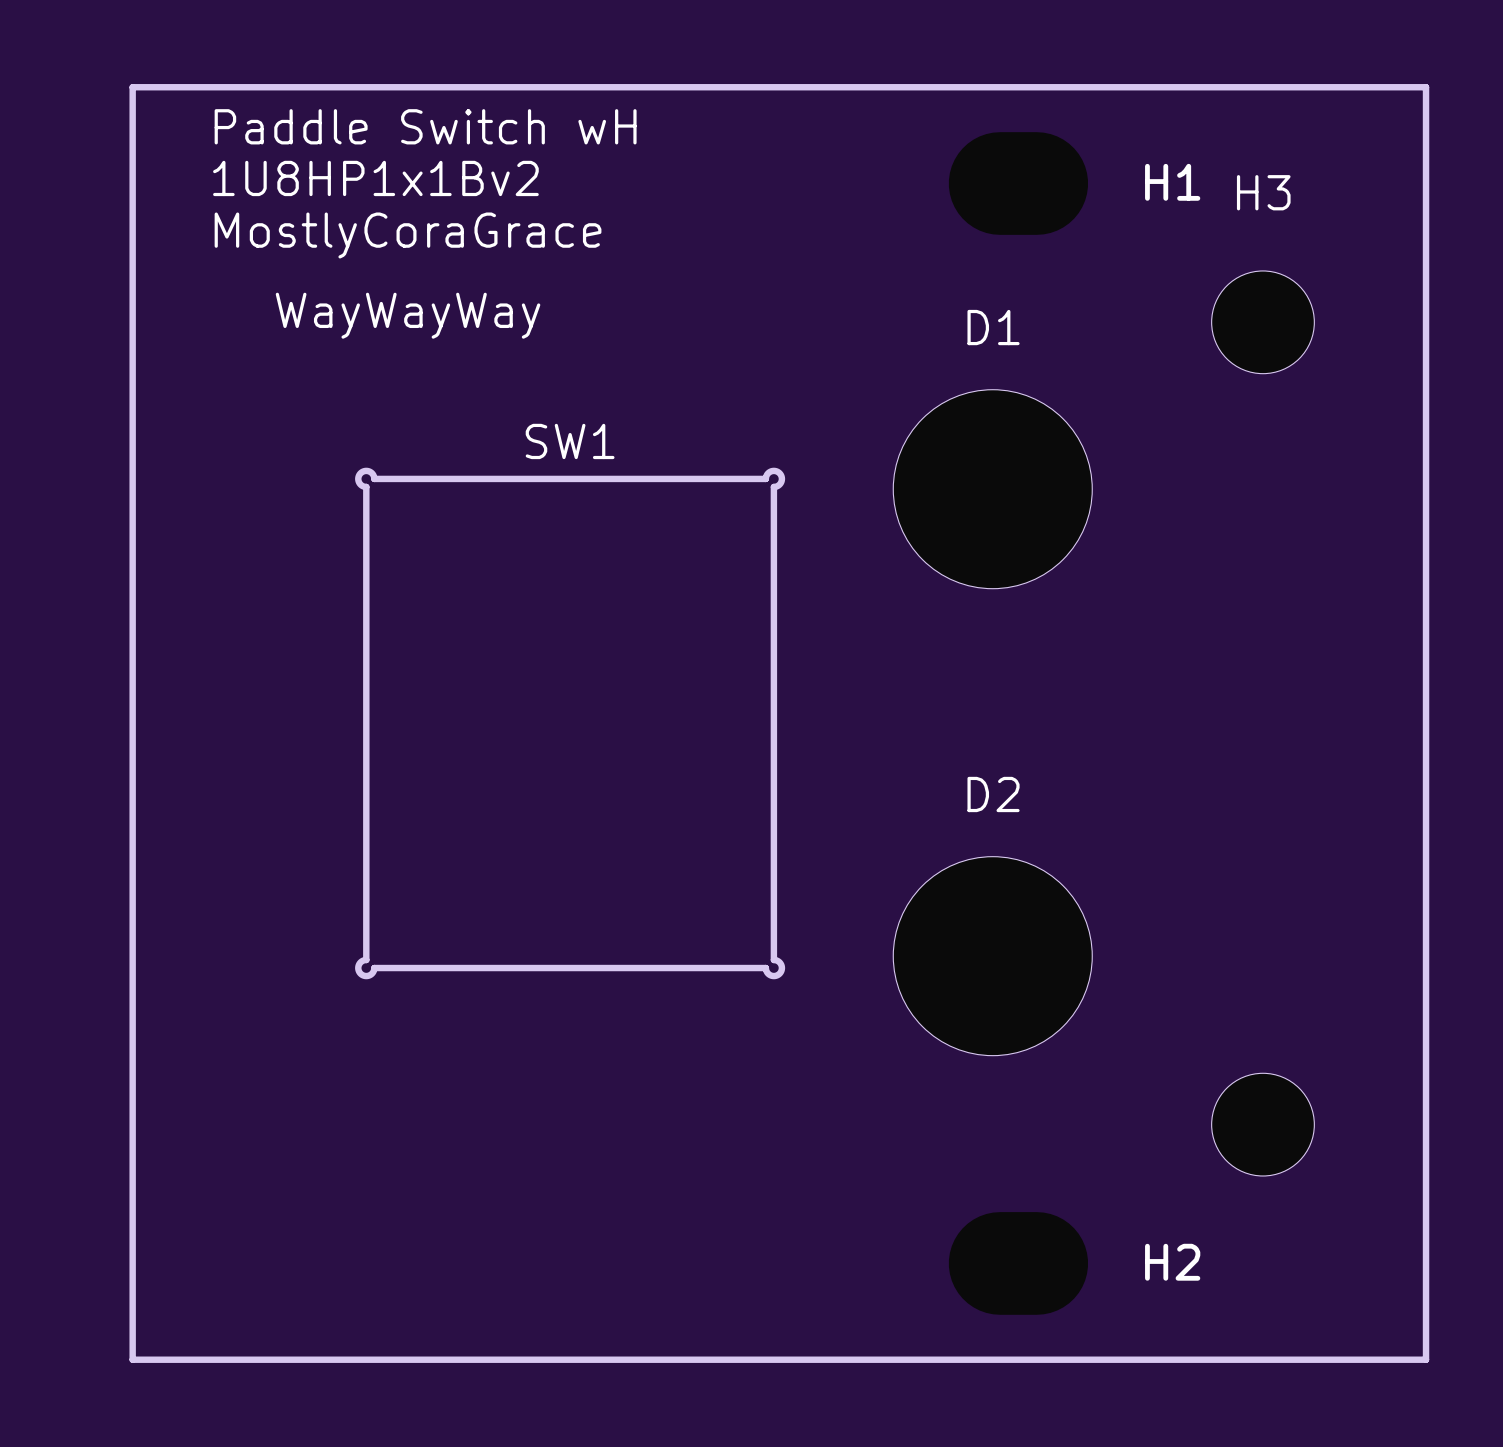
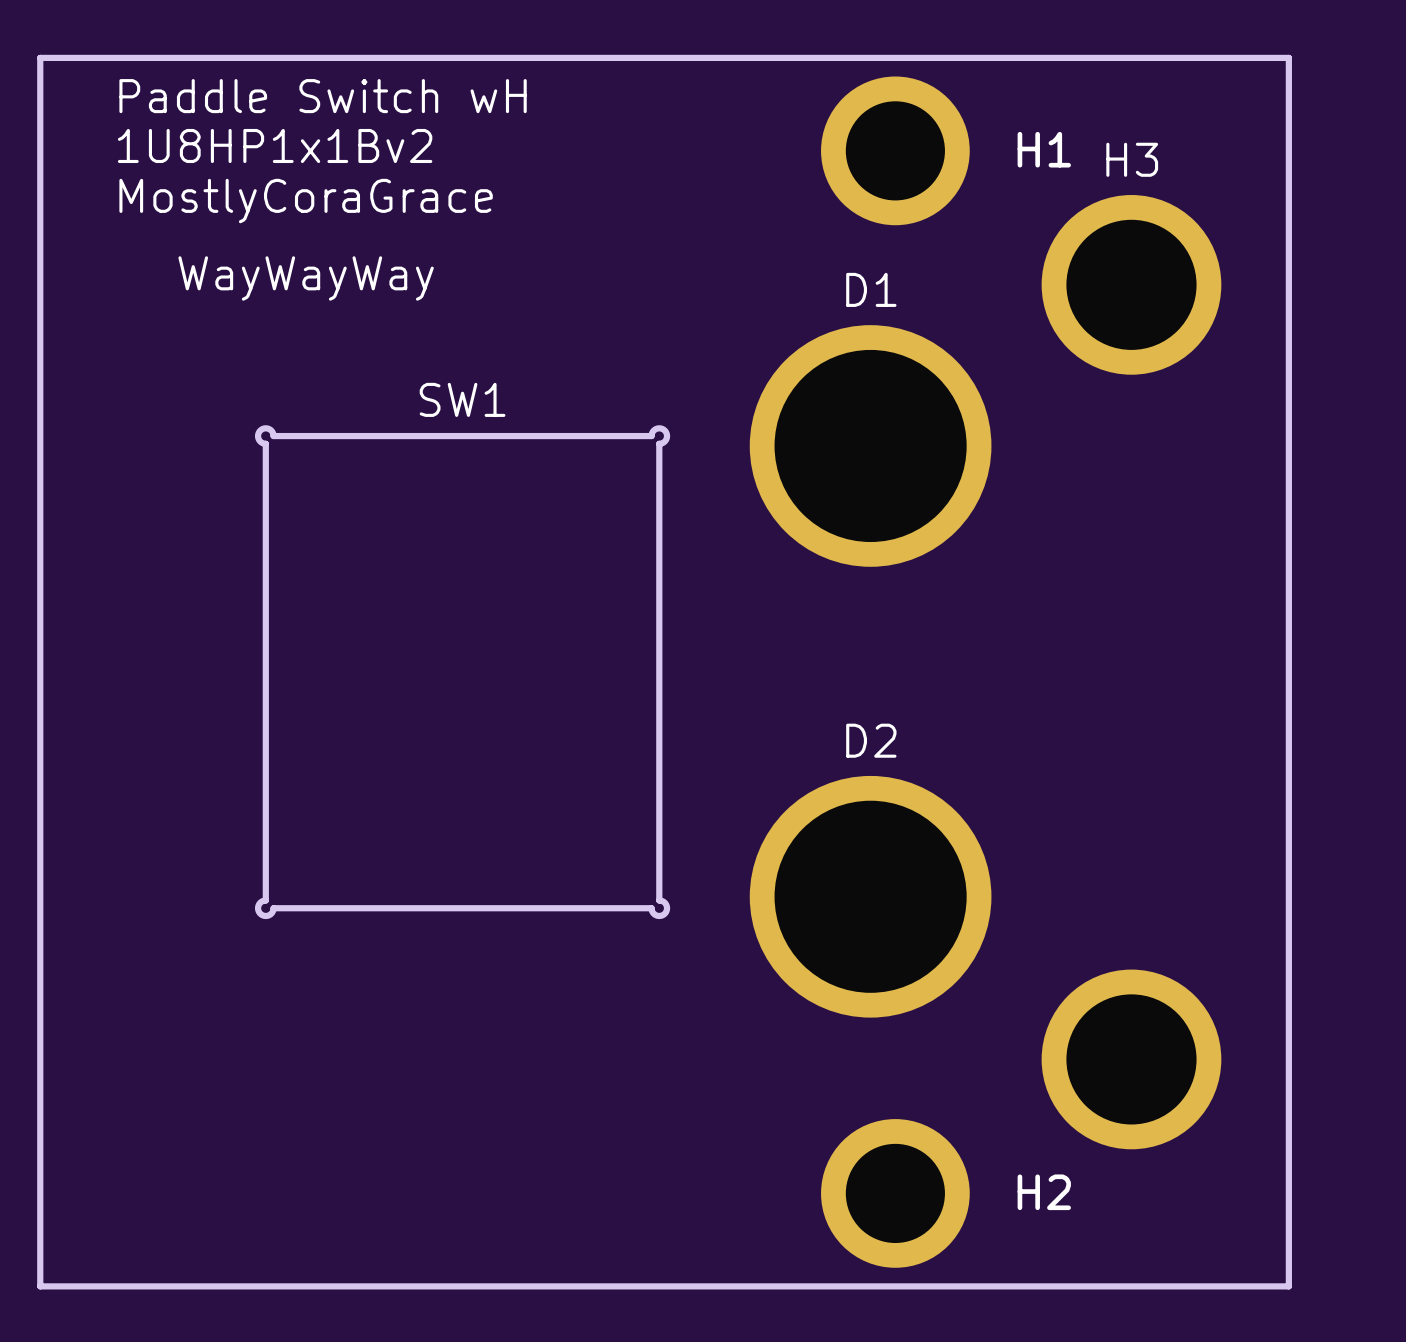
H1 footprint: [948, 132, 1089, 235] -> [821, 76, 970, 226]
H3 footprint: [1211, 270, 1315, 1176] -> [1041, 195, 1222, 1150]
D1 footprint: [893, 389, 1093, 589] -> [749, 325, 992, 567]
D2 footprint: [893, 856, 1093, 1056] -> [749, 775, 992, 1018]
H2 footprint: [948, 1212, 1089, 1315] -> [821, 1119, 970, 1268]

